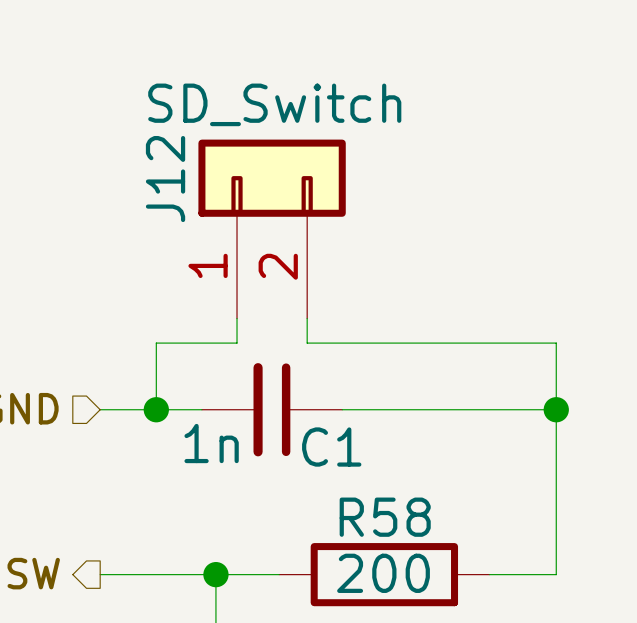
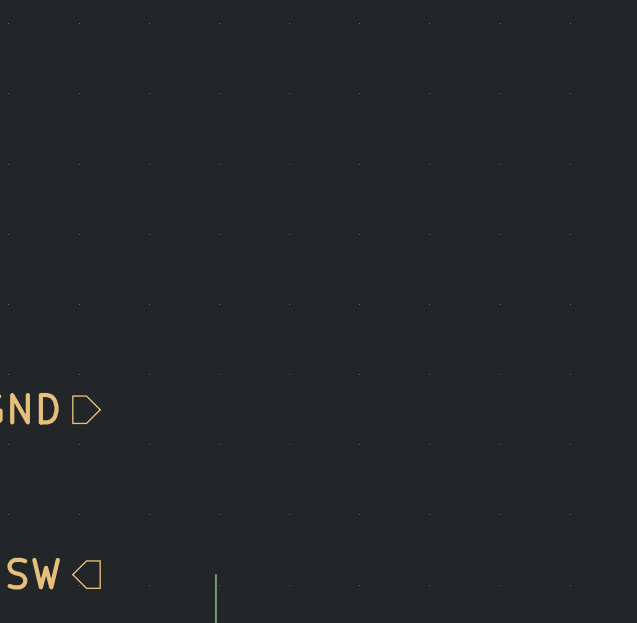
J12: SD_Switch (272, 229) -> none
wire: (237, 318) (237, 343) (156, 343) (156, 409) -> none
wire: (307, 318) (307, 343) (556, 343) (556, 574) (489, 574) -> none
wire: (100, 409) (201, 409) -> none
junction: (156, 409) -> none
C1: 1n (272, 409) -> none
wire: (342, 409) (556, 409) -> none
junction: (556, 409) -> none
wire: (100, 574) (279, 574) -> none
junction: (215, 574) -> none
R58: 200 (384, 574) -> none

